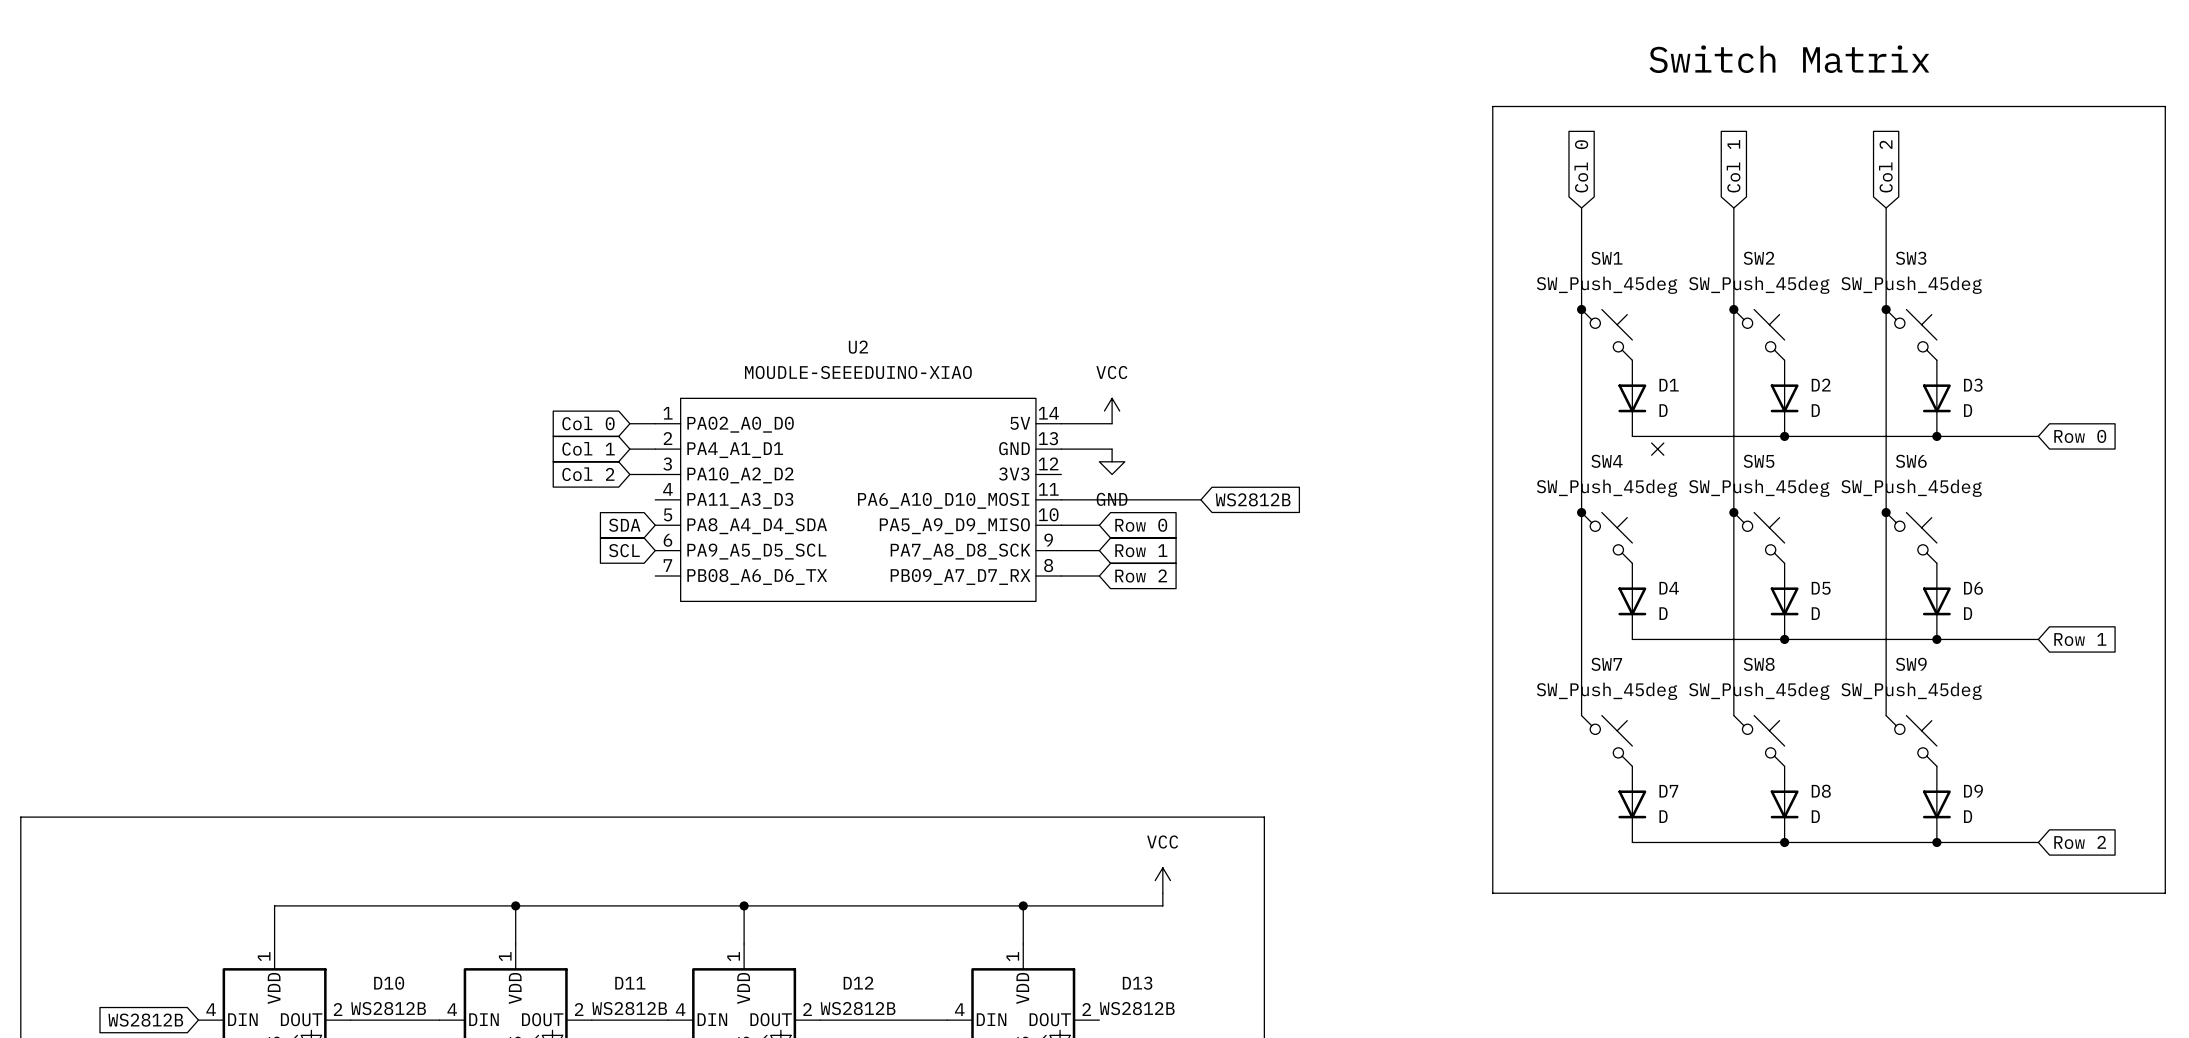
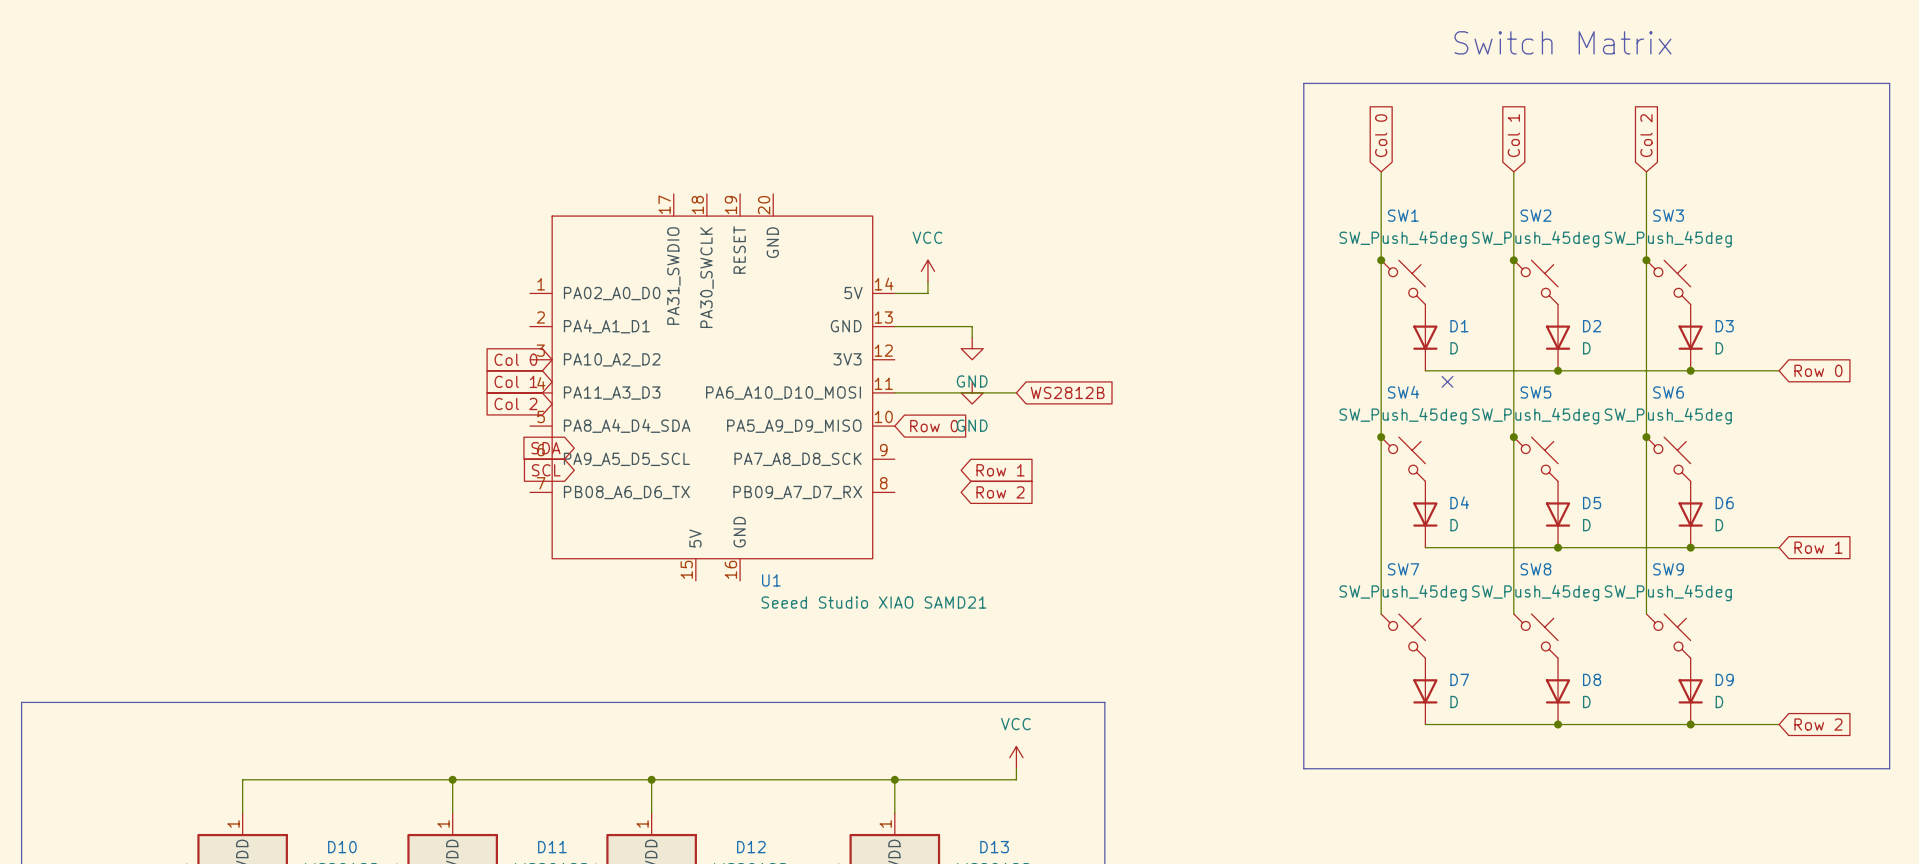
power symbol: none -> VCC (927, 271)
wire: none -> (927, 282) (927, 293) (894, 293)
wire: none -> (894, 326) (972, 326) (972, 337)
power symbol: VCC (1112, 411) -> GND (972, 348)
wire: (629, 423) (655, 423) -> none
wire: (1061, 423) (1112, 423) -> none
wire: (629, 449) (655, 449) -> none
wire: (1061, 449) (1112, 449) -> none
U1: none -> Seeed Studio XIAO SAMD21 (712, 387)
wire: (629, 474) (655, 474) -> none
U2: MOUDLE-SEEEDUINO-XIAO (858, 499) -> none
wire: (1061, 499) (1200, 499) -> (894, 392) (1016, 392)
global label position: WS2812B (1253, 499) -> WS2812B (1067, 392)
wire: (1061, 525) (1099, 525) -> none
global label position: Row 0 (1141, 525) -> Row 0 (934, 426)
wire: (1061, 550) (1099, 550) -> none
wire: (1061, 576) (1099, 576) -> none

